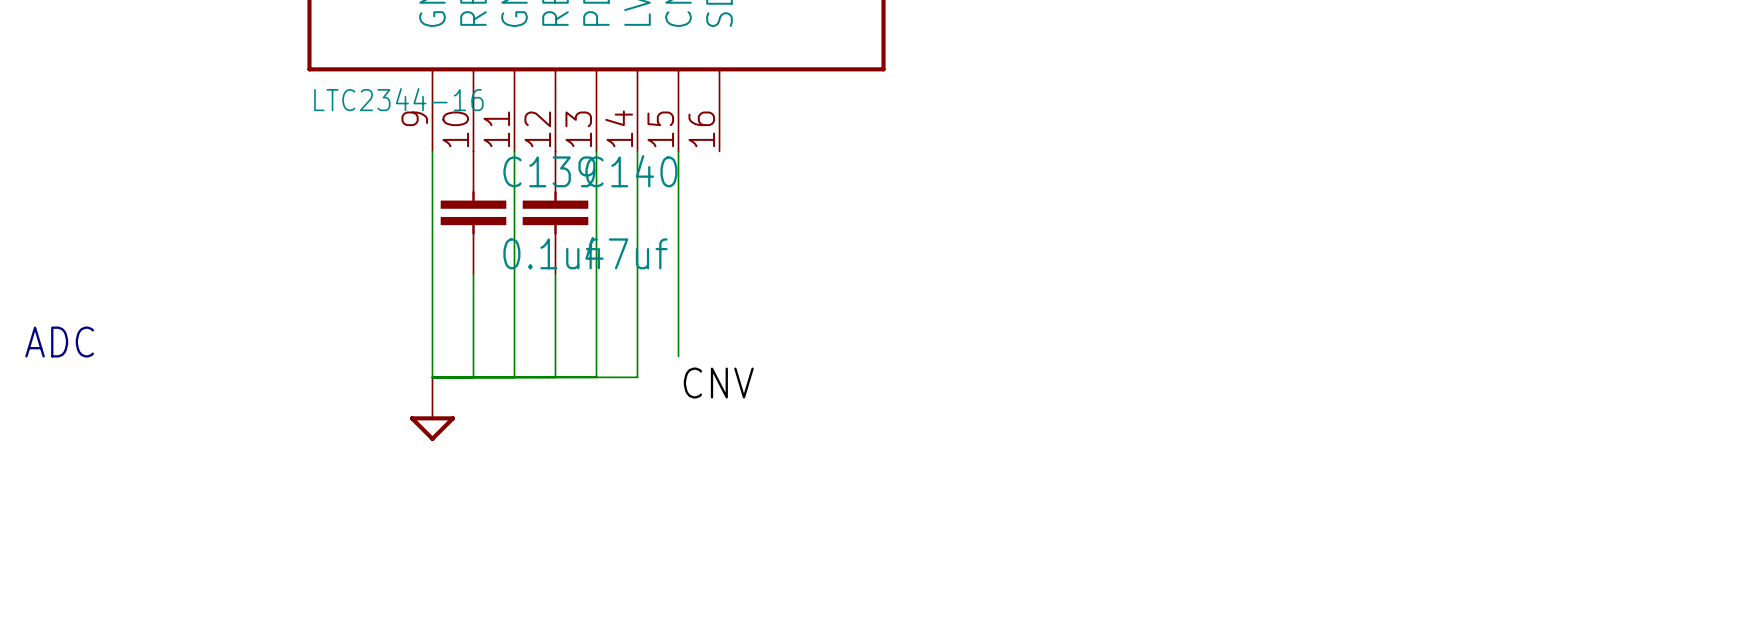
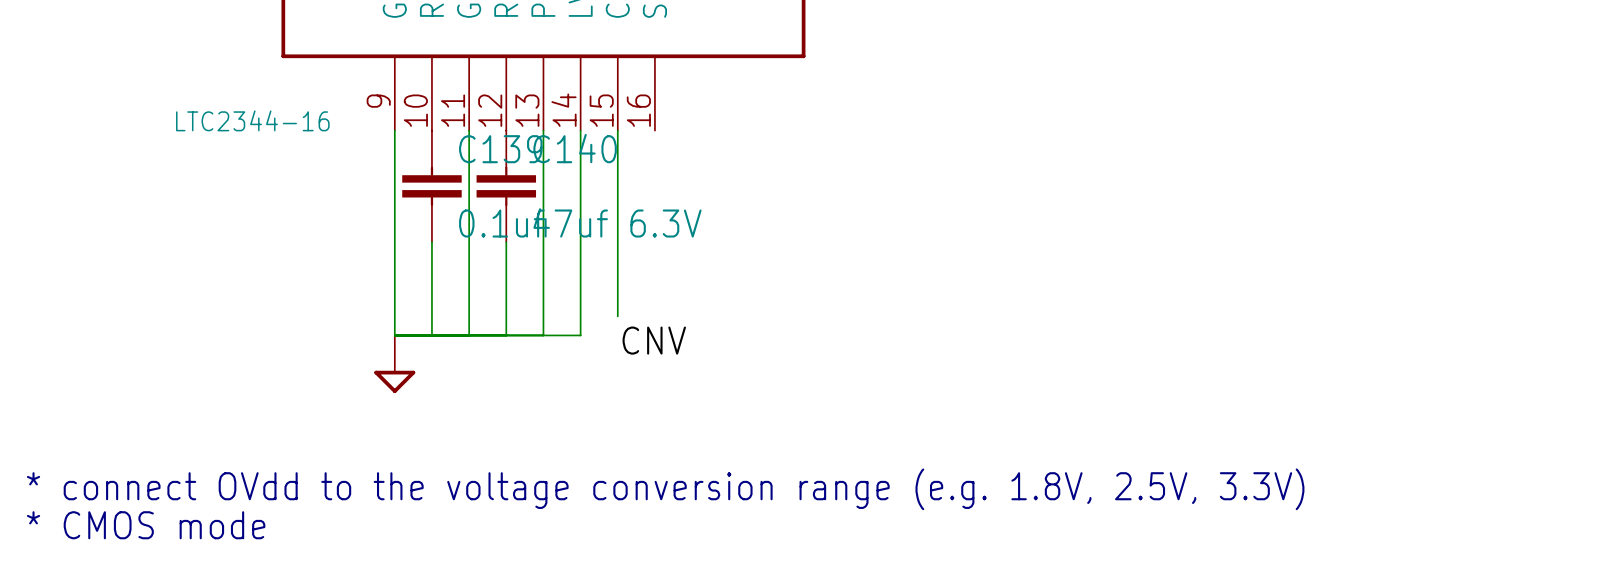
part value position: LTC2344-16 (398, 99) -> LTC2344-16 (252, 120)
C140 value: 47uf (626, 253) -> 47uf 6.3V (617, 222)
text: ADC (59, 342) -> none
text: none -> * connect OVdd to the voltage conversion range (e.g. 1.8V, 2.5V, 3.3V) (665, 489)
text: none -> * CMOS mode (146, 525)

